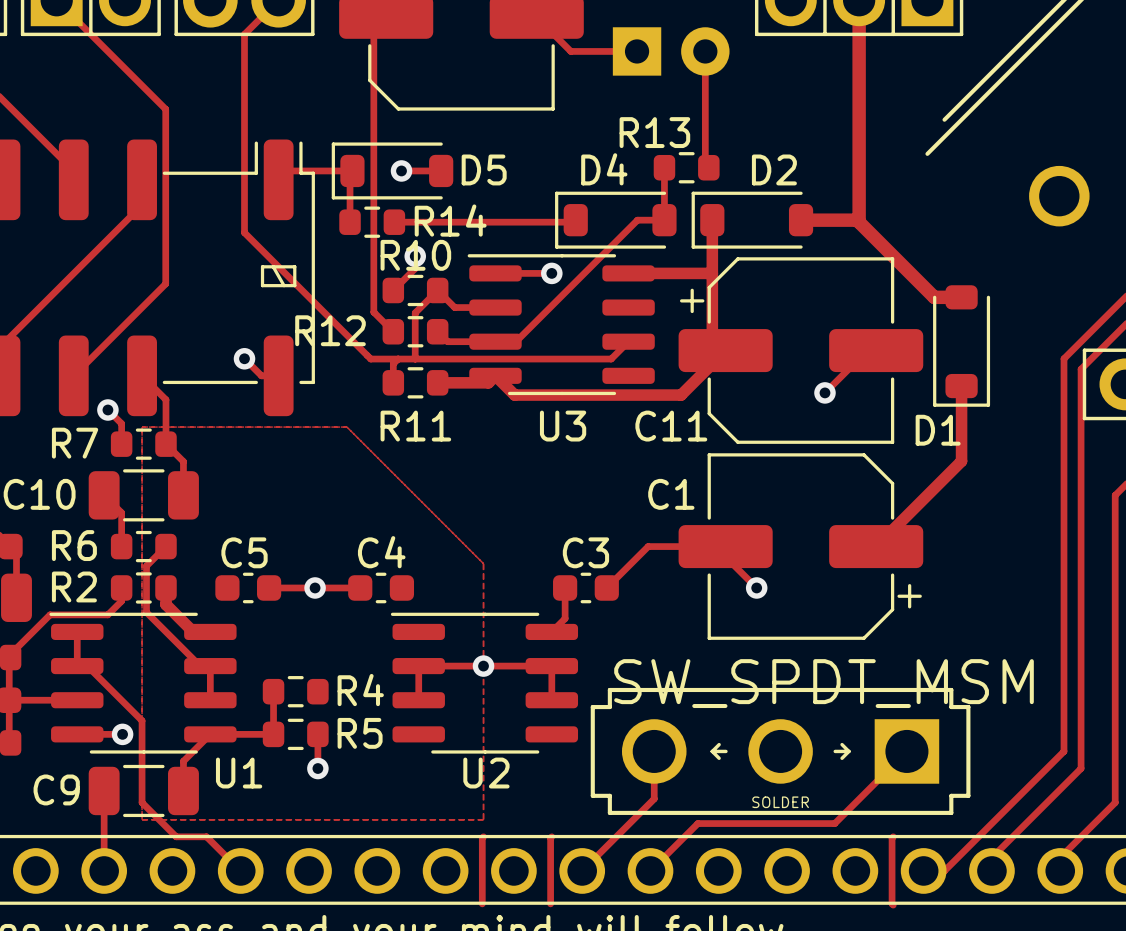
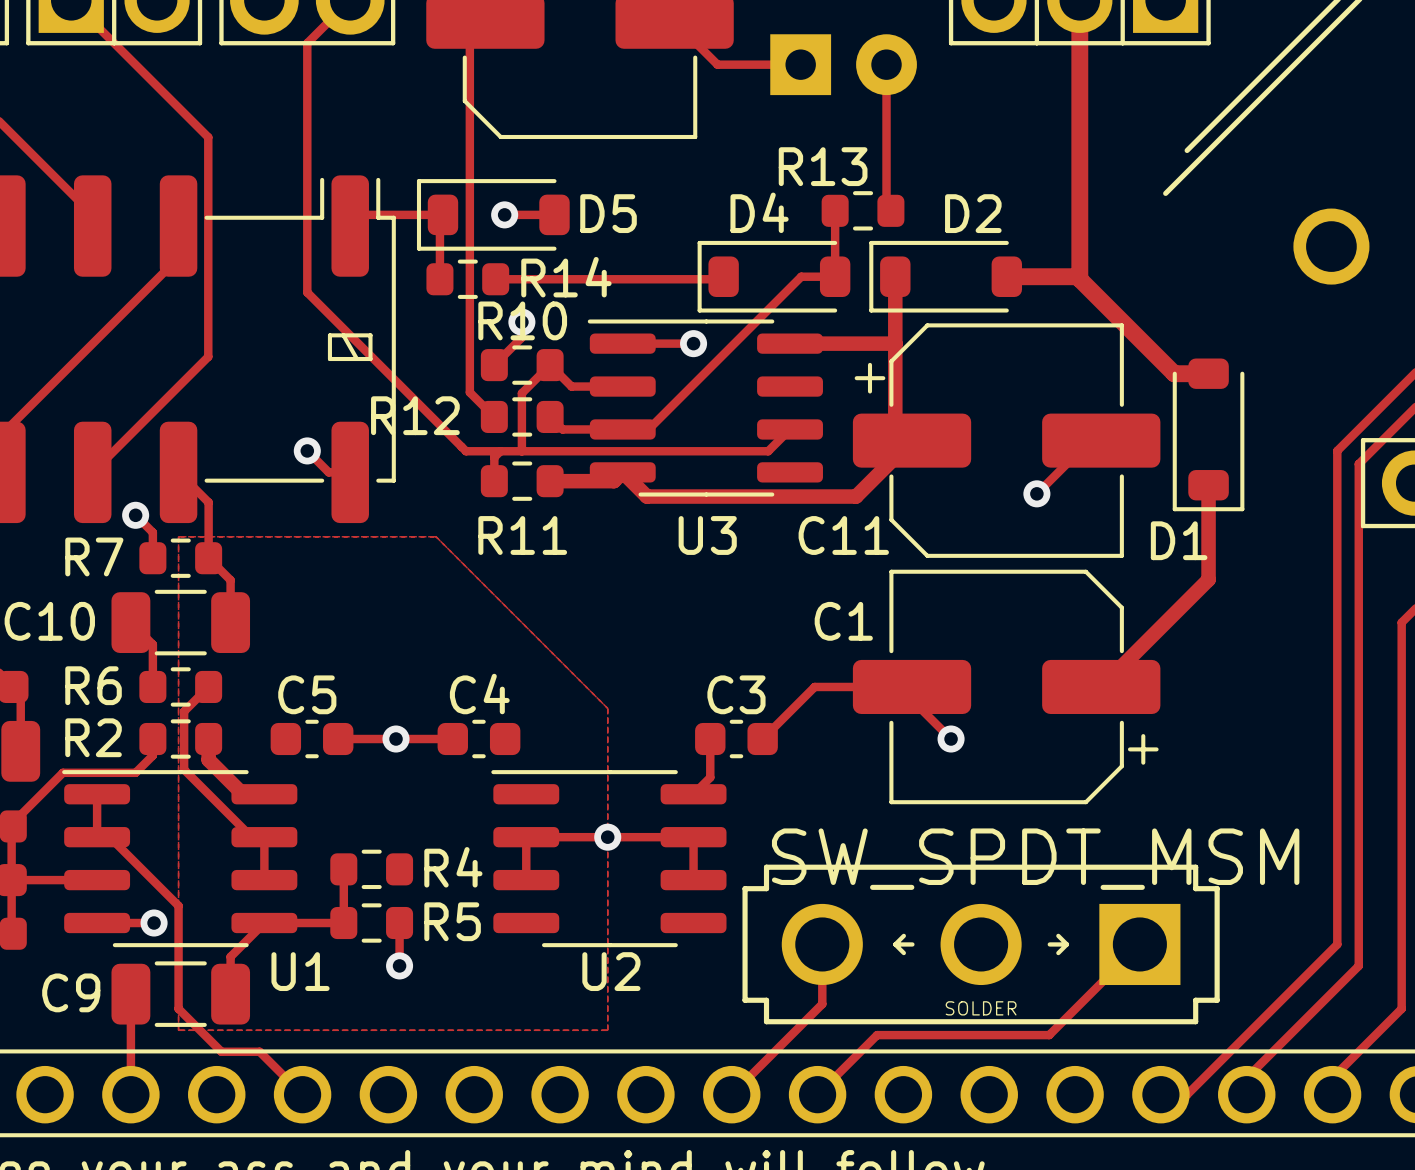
track: (483, 836) (482, 903) -> none
track: (551, 836) (550, 903) -> none
track: (893, 836) (893, 905) -> none

